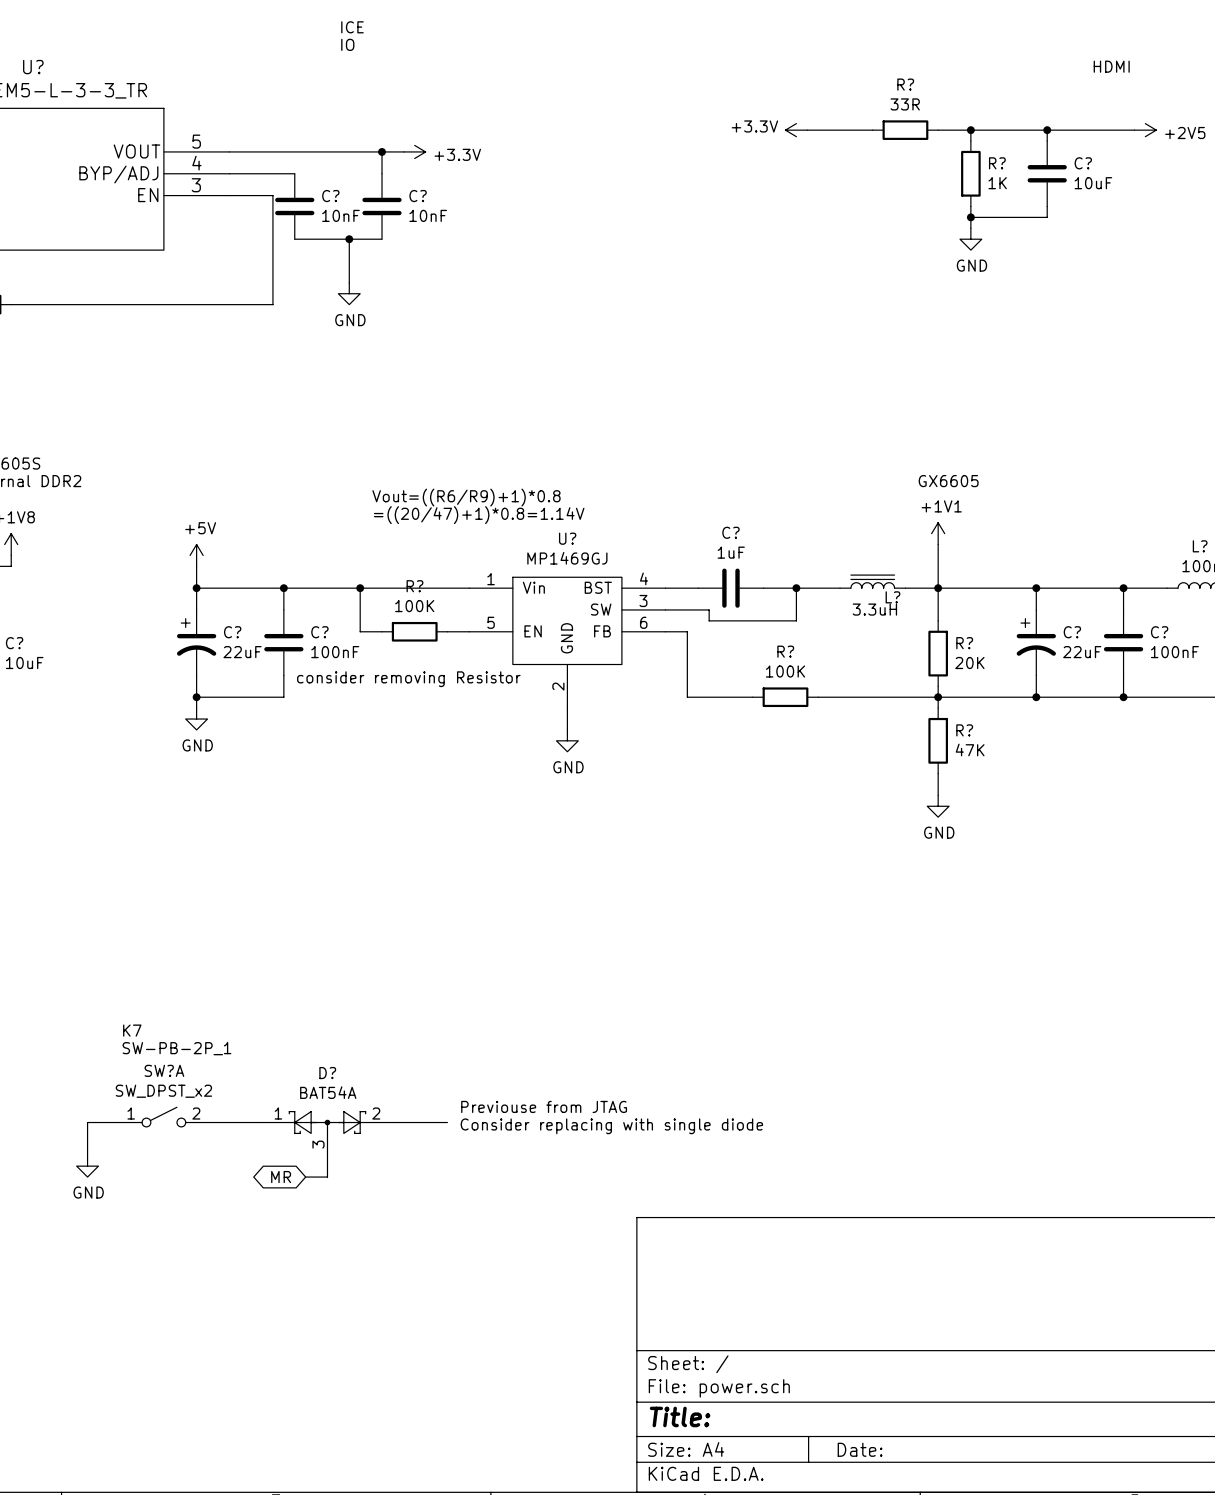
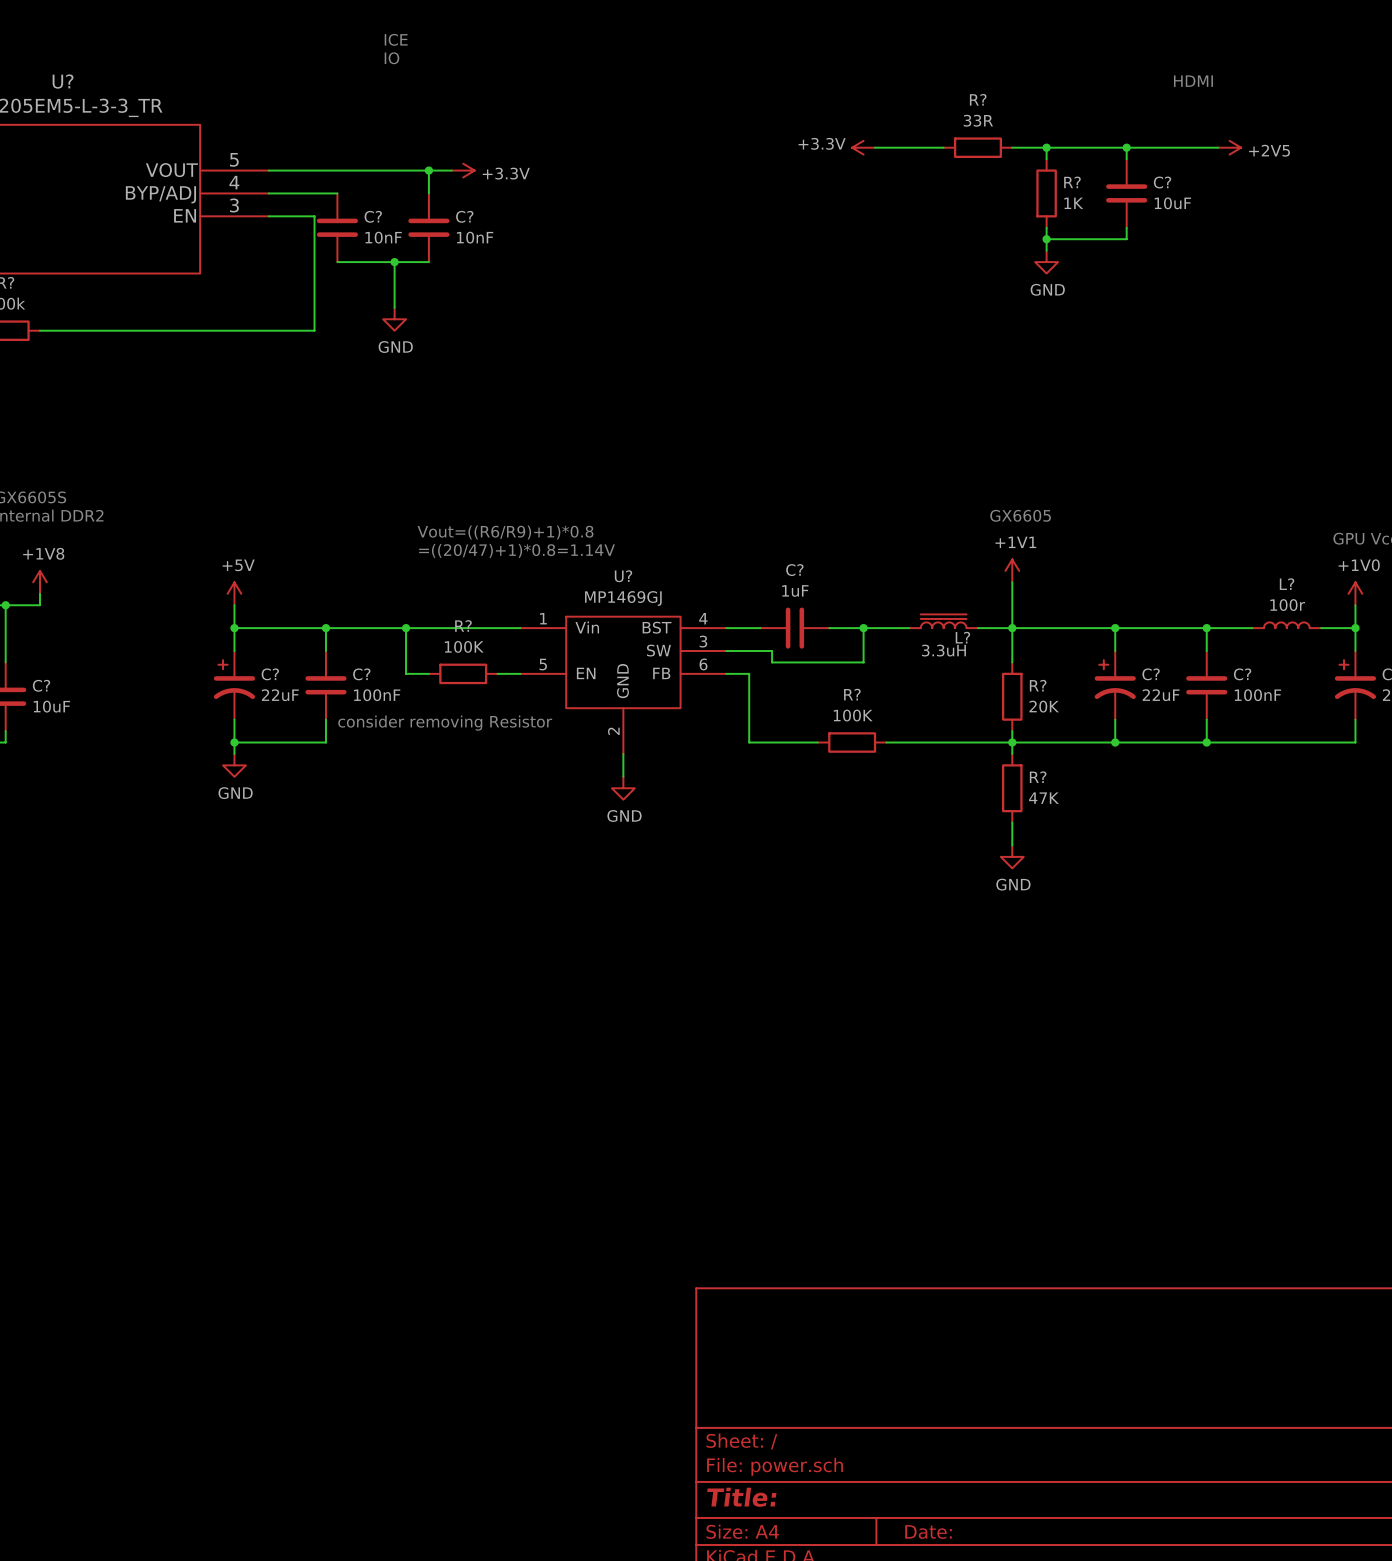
text: K7 (132, 1030) -> none
text: SW-PB-2P_1 (176, 1048) -> none
text: Previouse from JTAG (544, 1106) -> none
SW?A: SW_DPST_x2 (163, 1117) -> none
wire: (120, 1122) (87, 1122) (87, 1155) -> none
wire: (207, 1122) (262, 1122) -> none
wire: (392, 1122) (447, 1122) -> none
text: Consider replacing with single diode (611, 1126) -> none
D?: BAT54A (327, 1138) -> none
power symbol: GND (87, 1166) -> none
wire: (327, 1166) (327, 1177) (305, 1177) -> none
global label: MR (281, 1177) -> none

